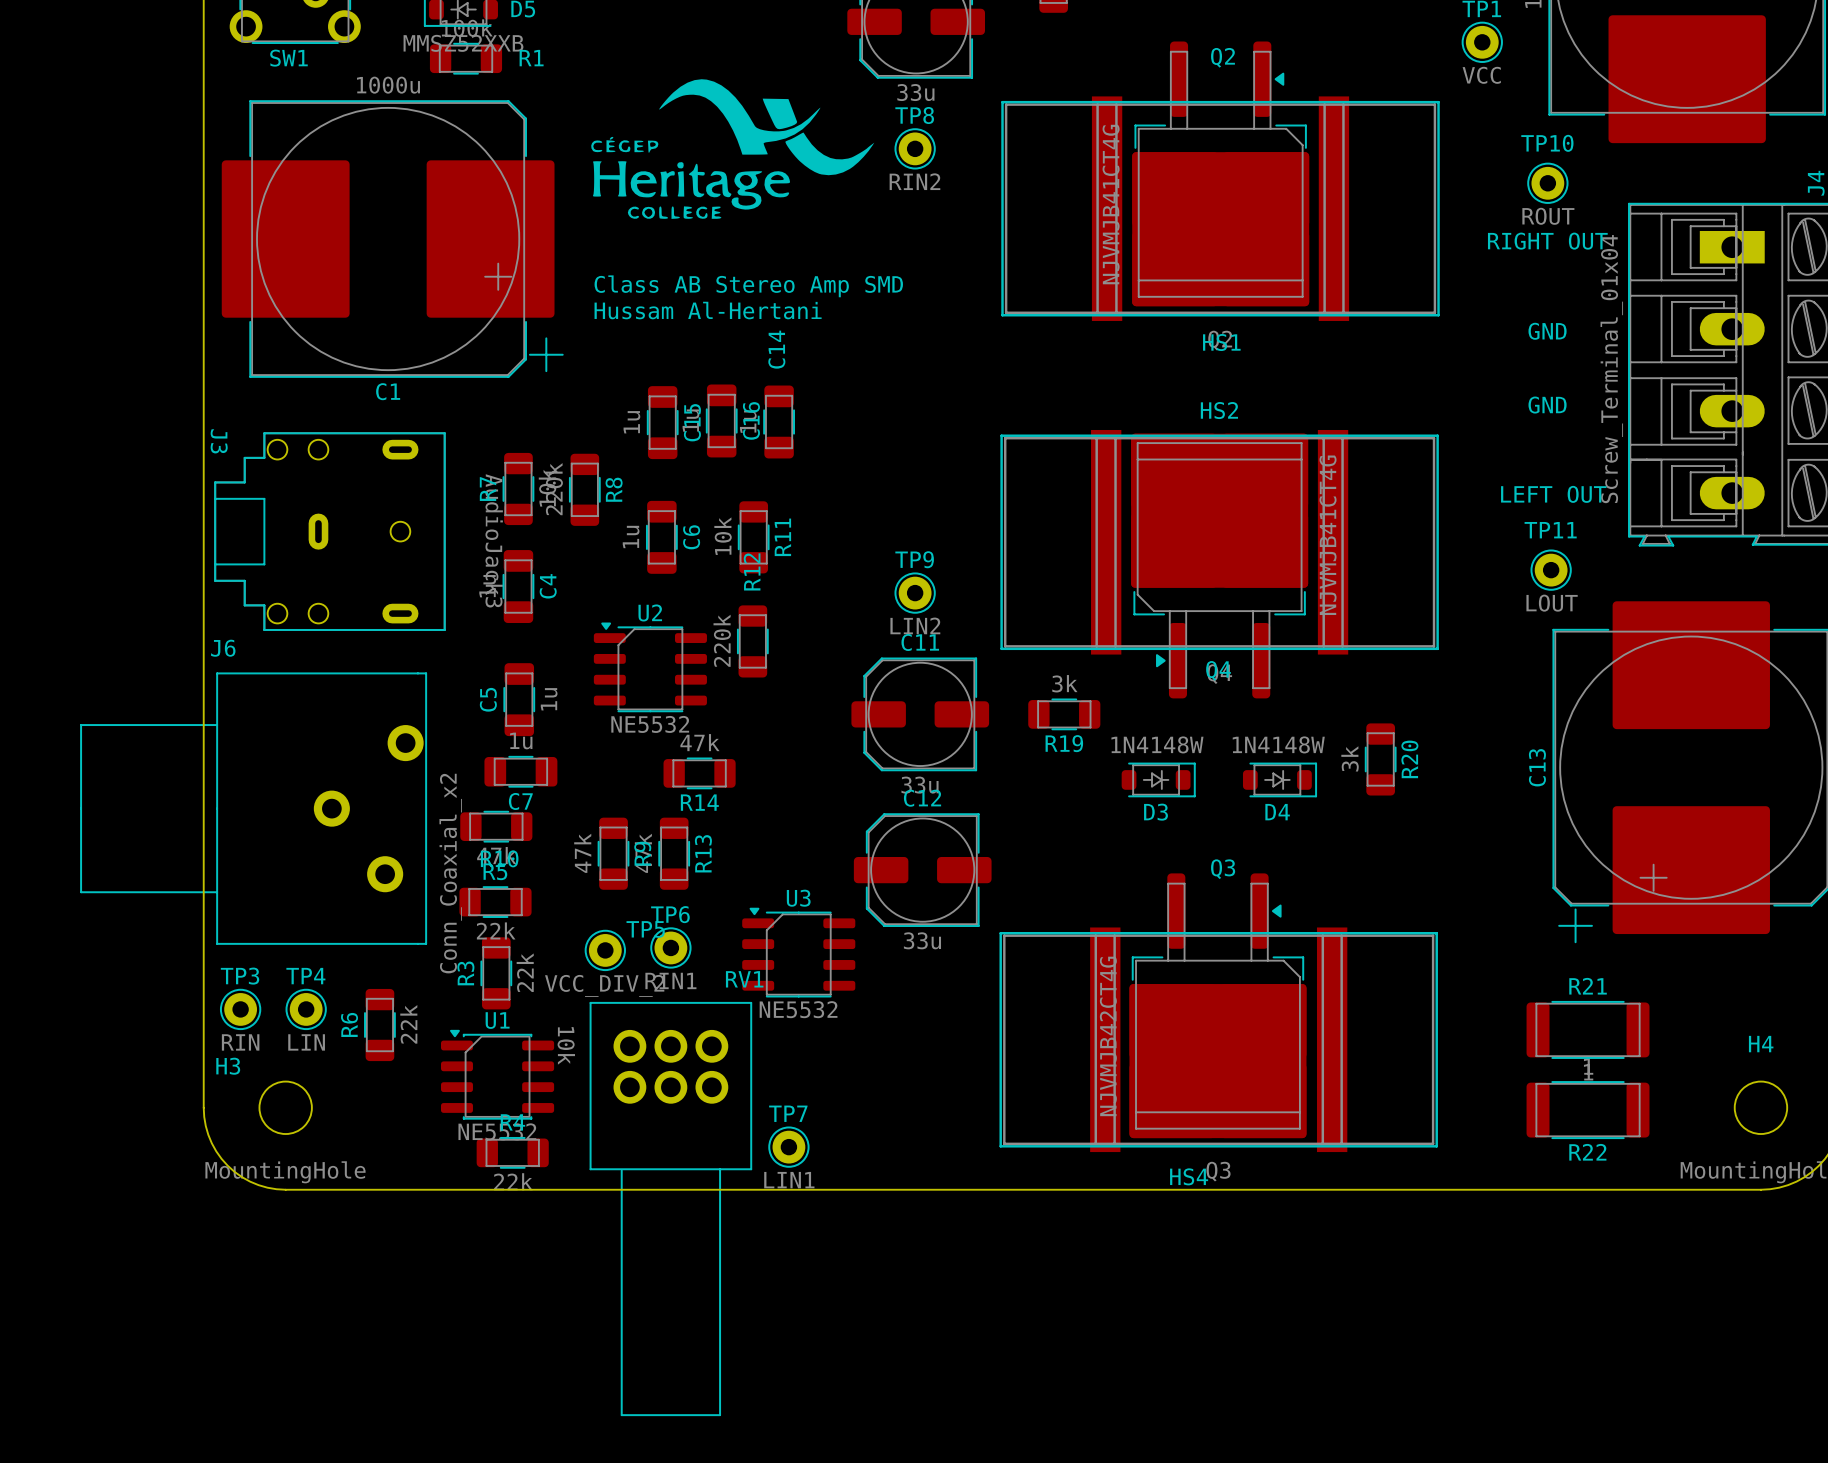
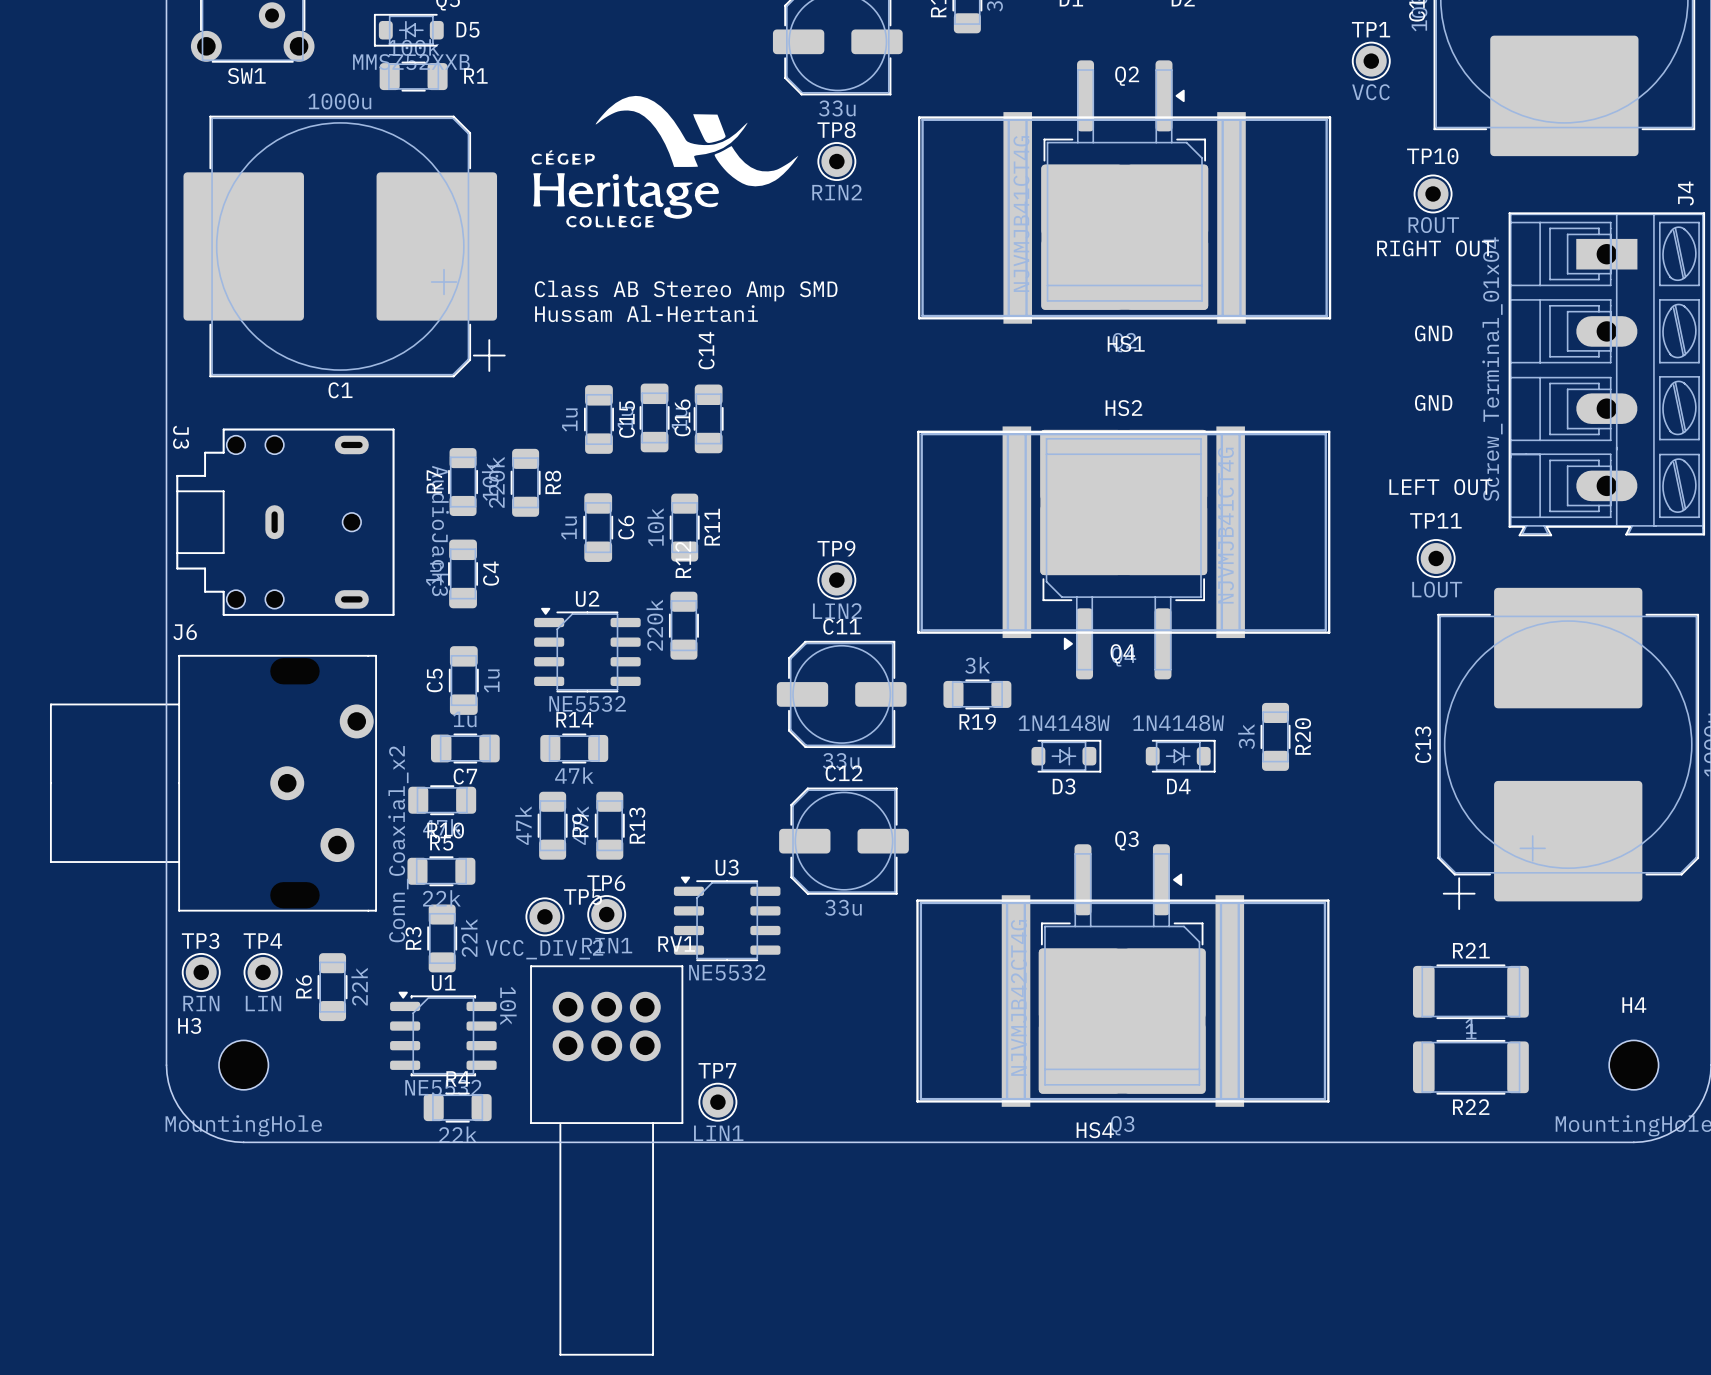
R14 value position: 47k (699, 742) -> 47k (574, 775)
R14 position: (699, 773) -> (574, 748)
R14 name position: R14 (699, 802) -> R14 (574, 719)

